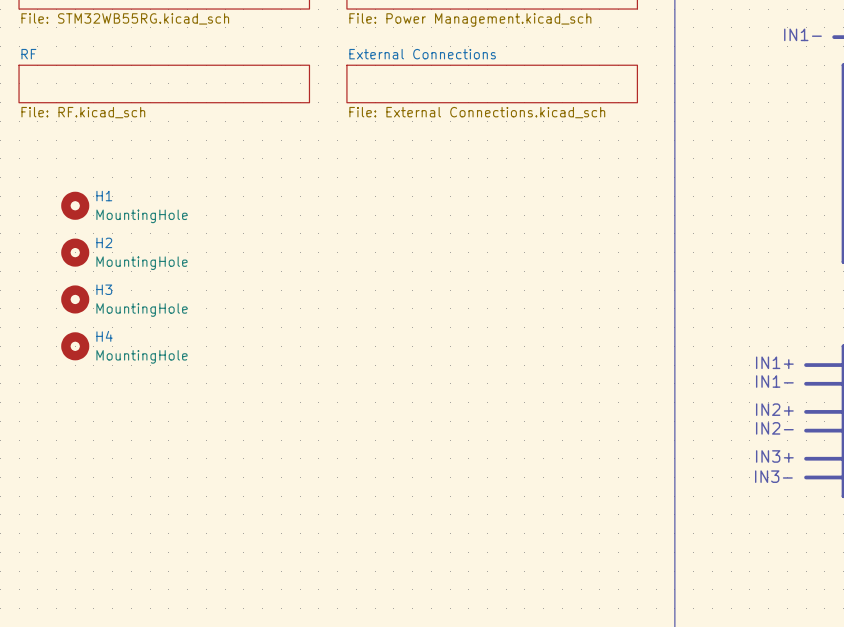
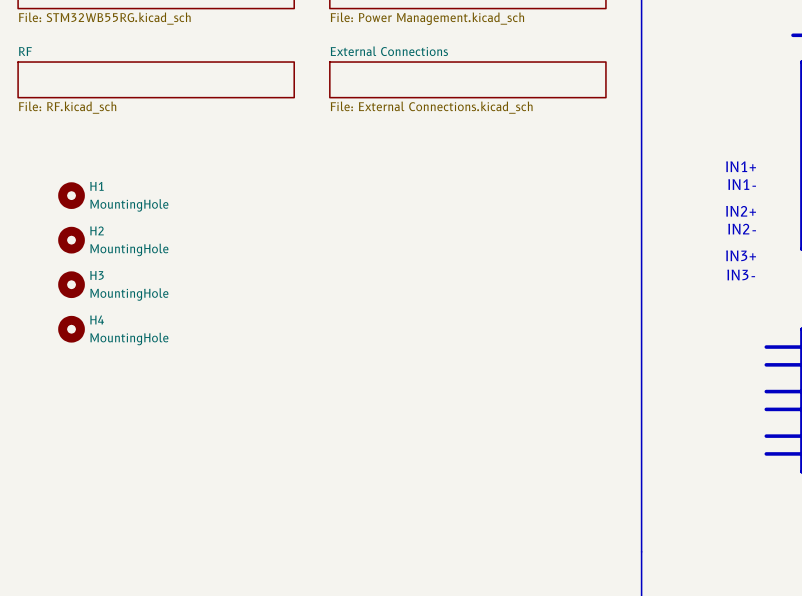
text: IN1- (802, 34) -> none
text: none -> IN1+ (741, 166)
text: none -> IN1- (742, 184)
text: none -> IN2+ (741, 211)
text: none -> IN2- (742, 229)
text: none -> IN3+ (741, 255)
text: none -> IN3- (741, 274)
text: IN1+ (774, 362) -> none
text: IN1- (774, 381) -> none
text: IN2+ (774, 409) -> none
text: IN2- (774, 428) -> none
text: IN3+ (774, 456) -> none
text: IN3- (773, 476) -> none

